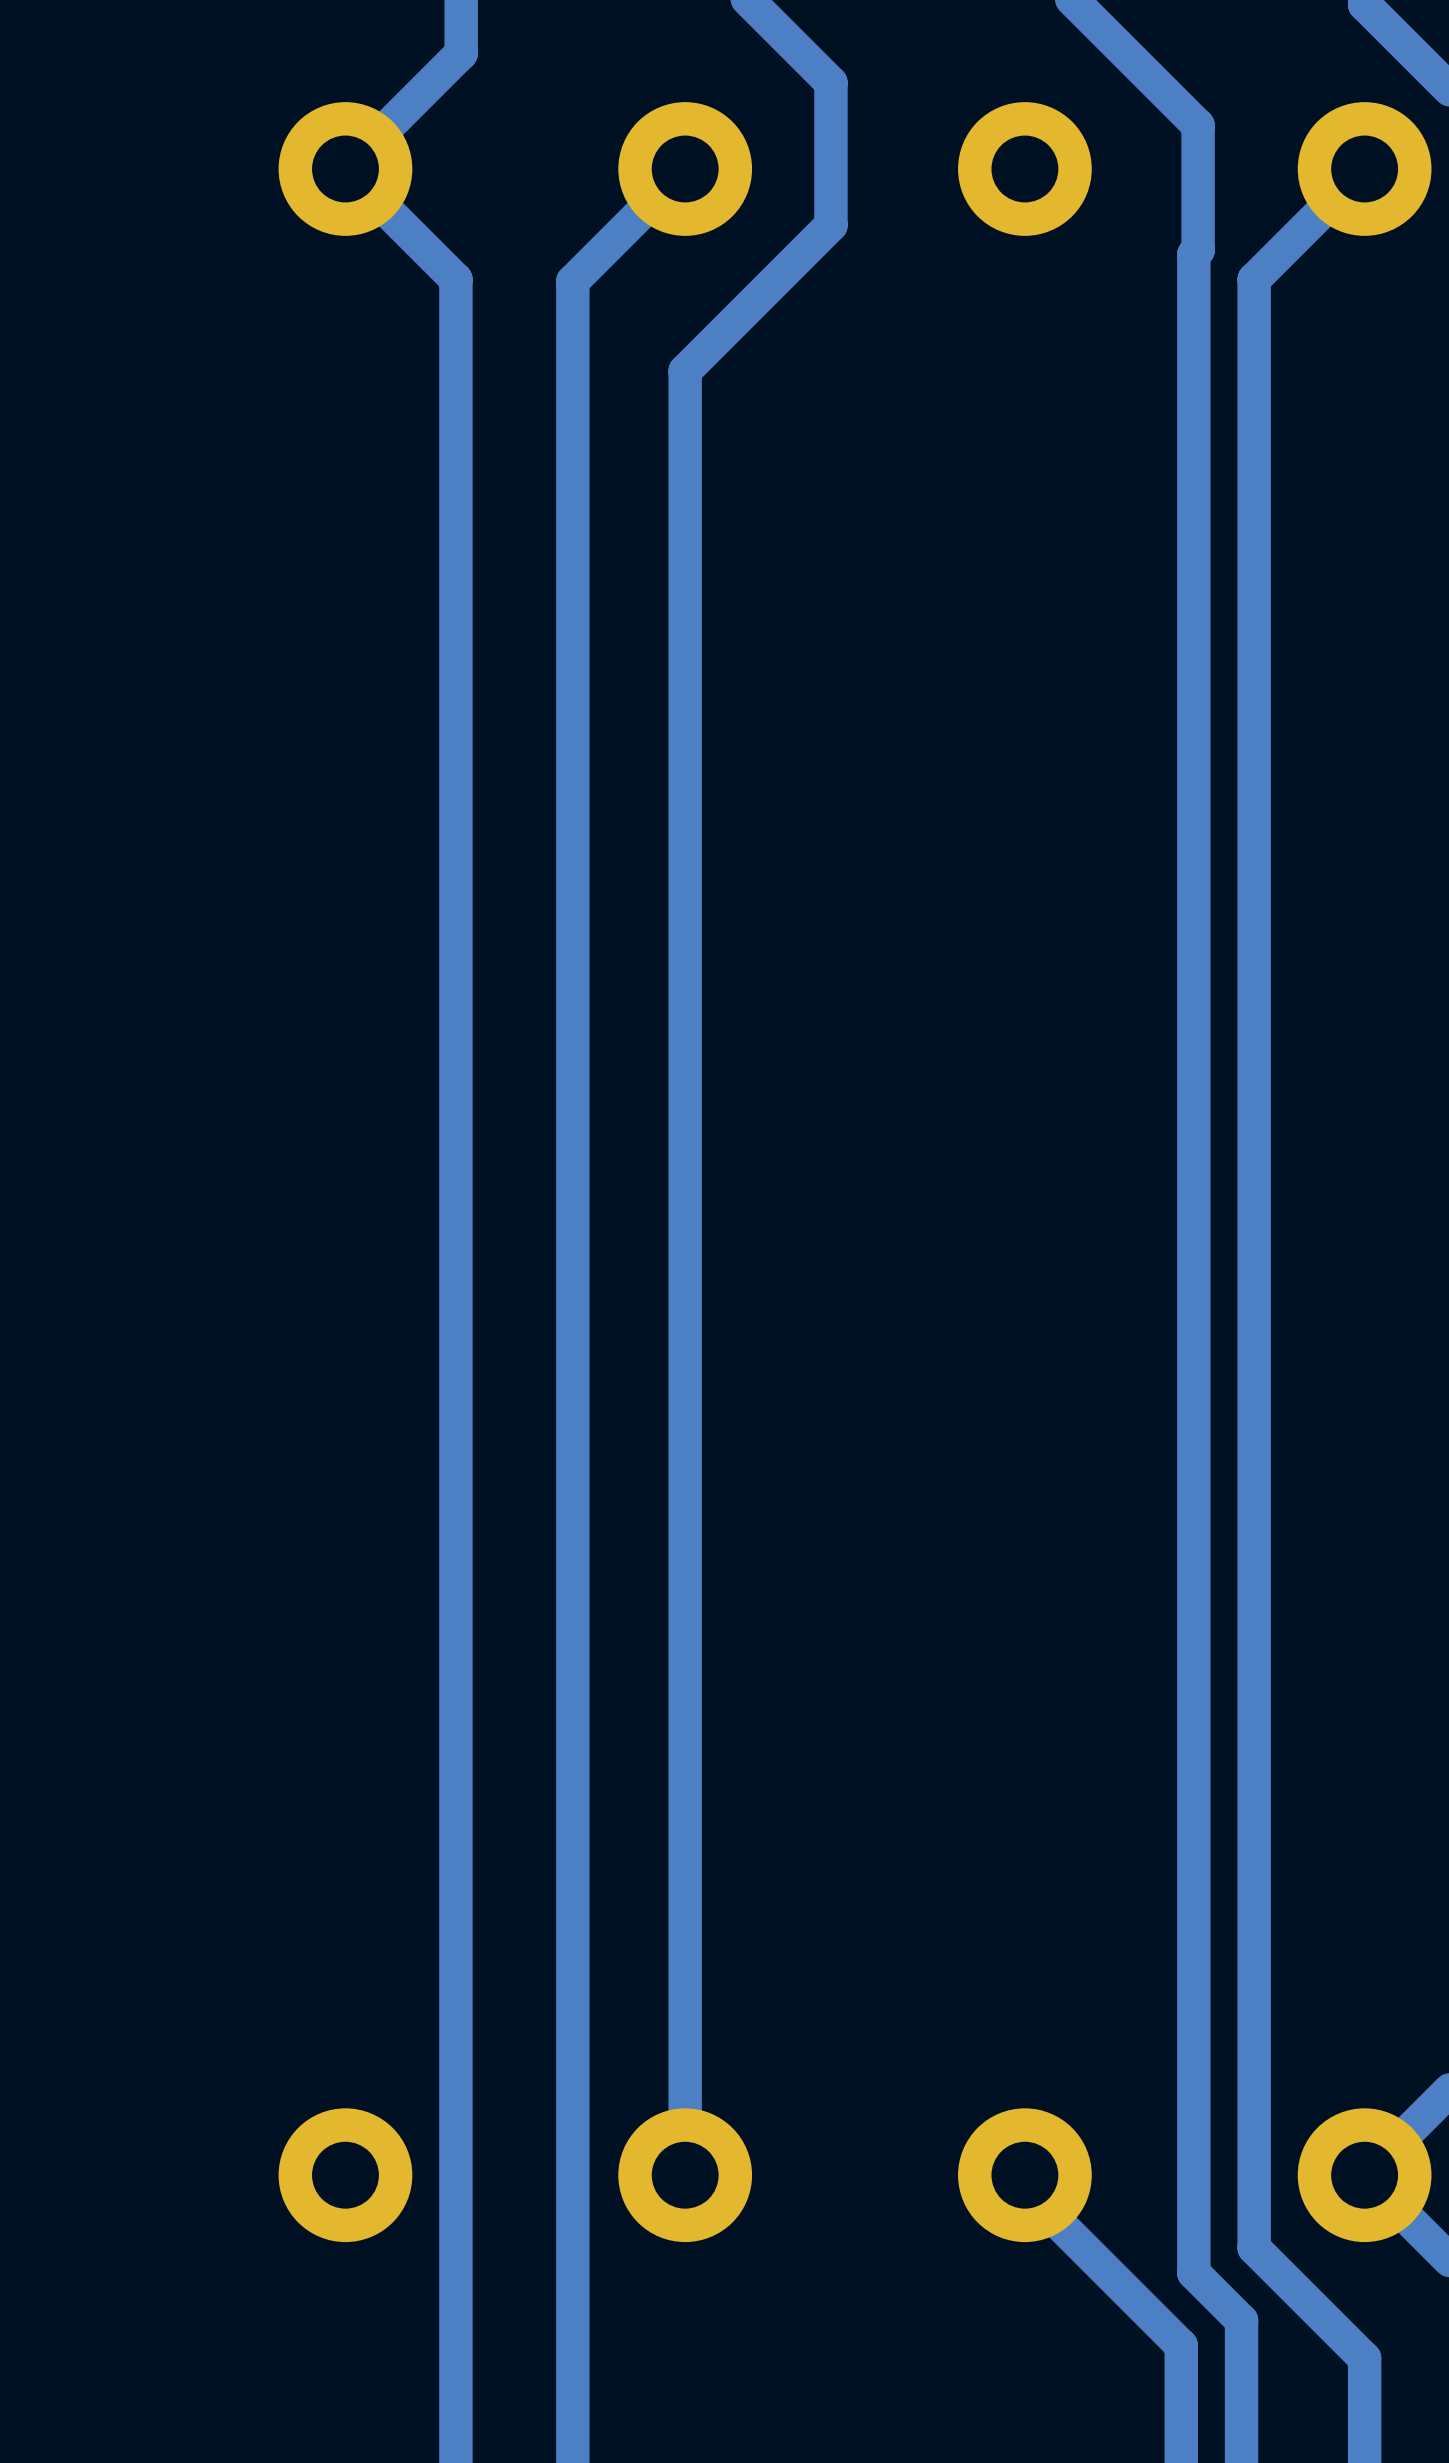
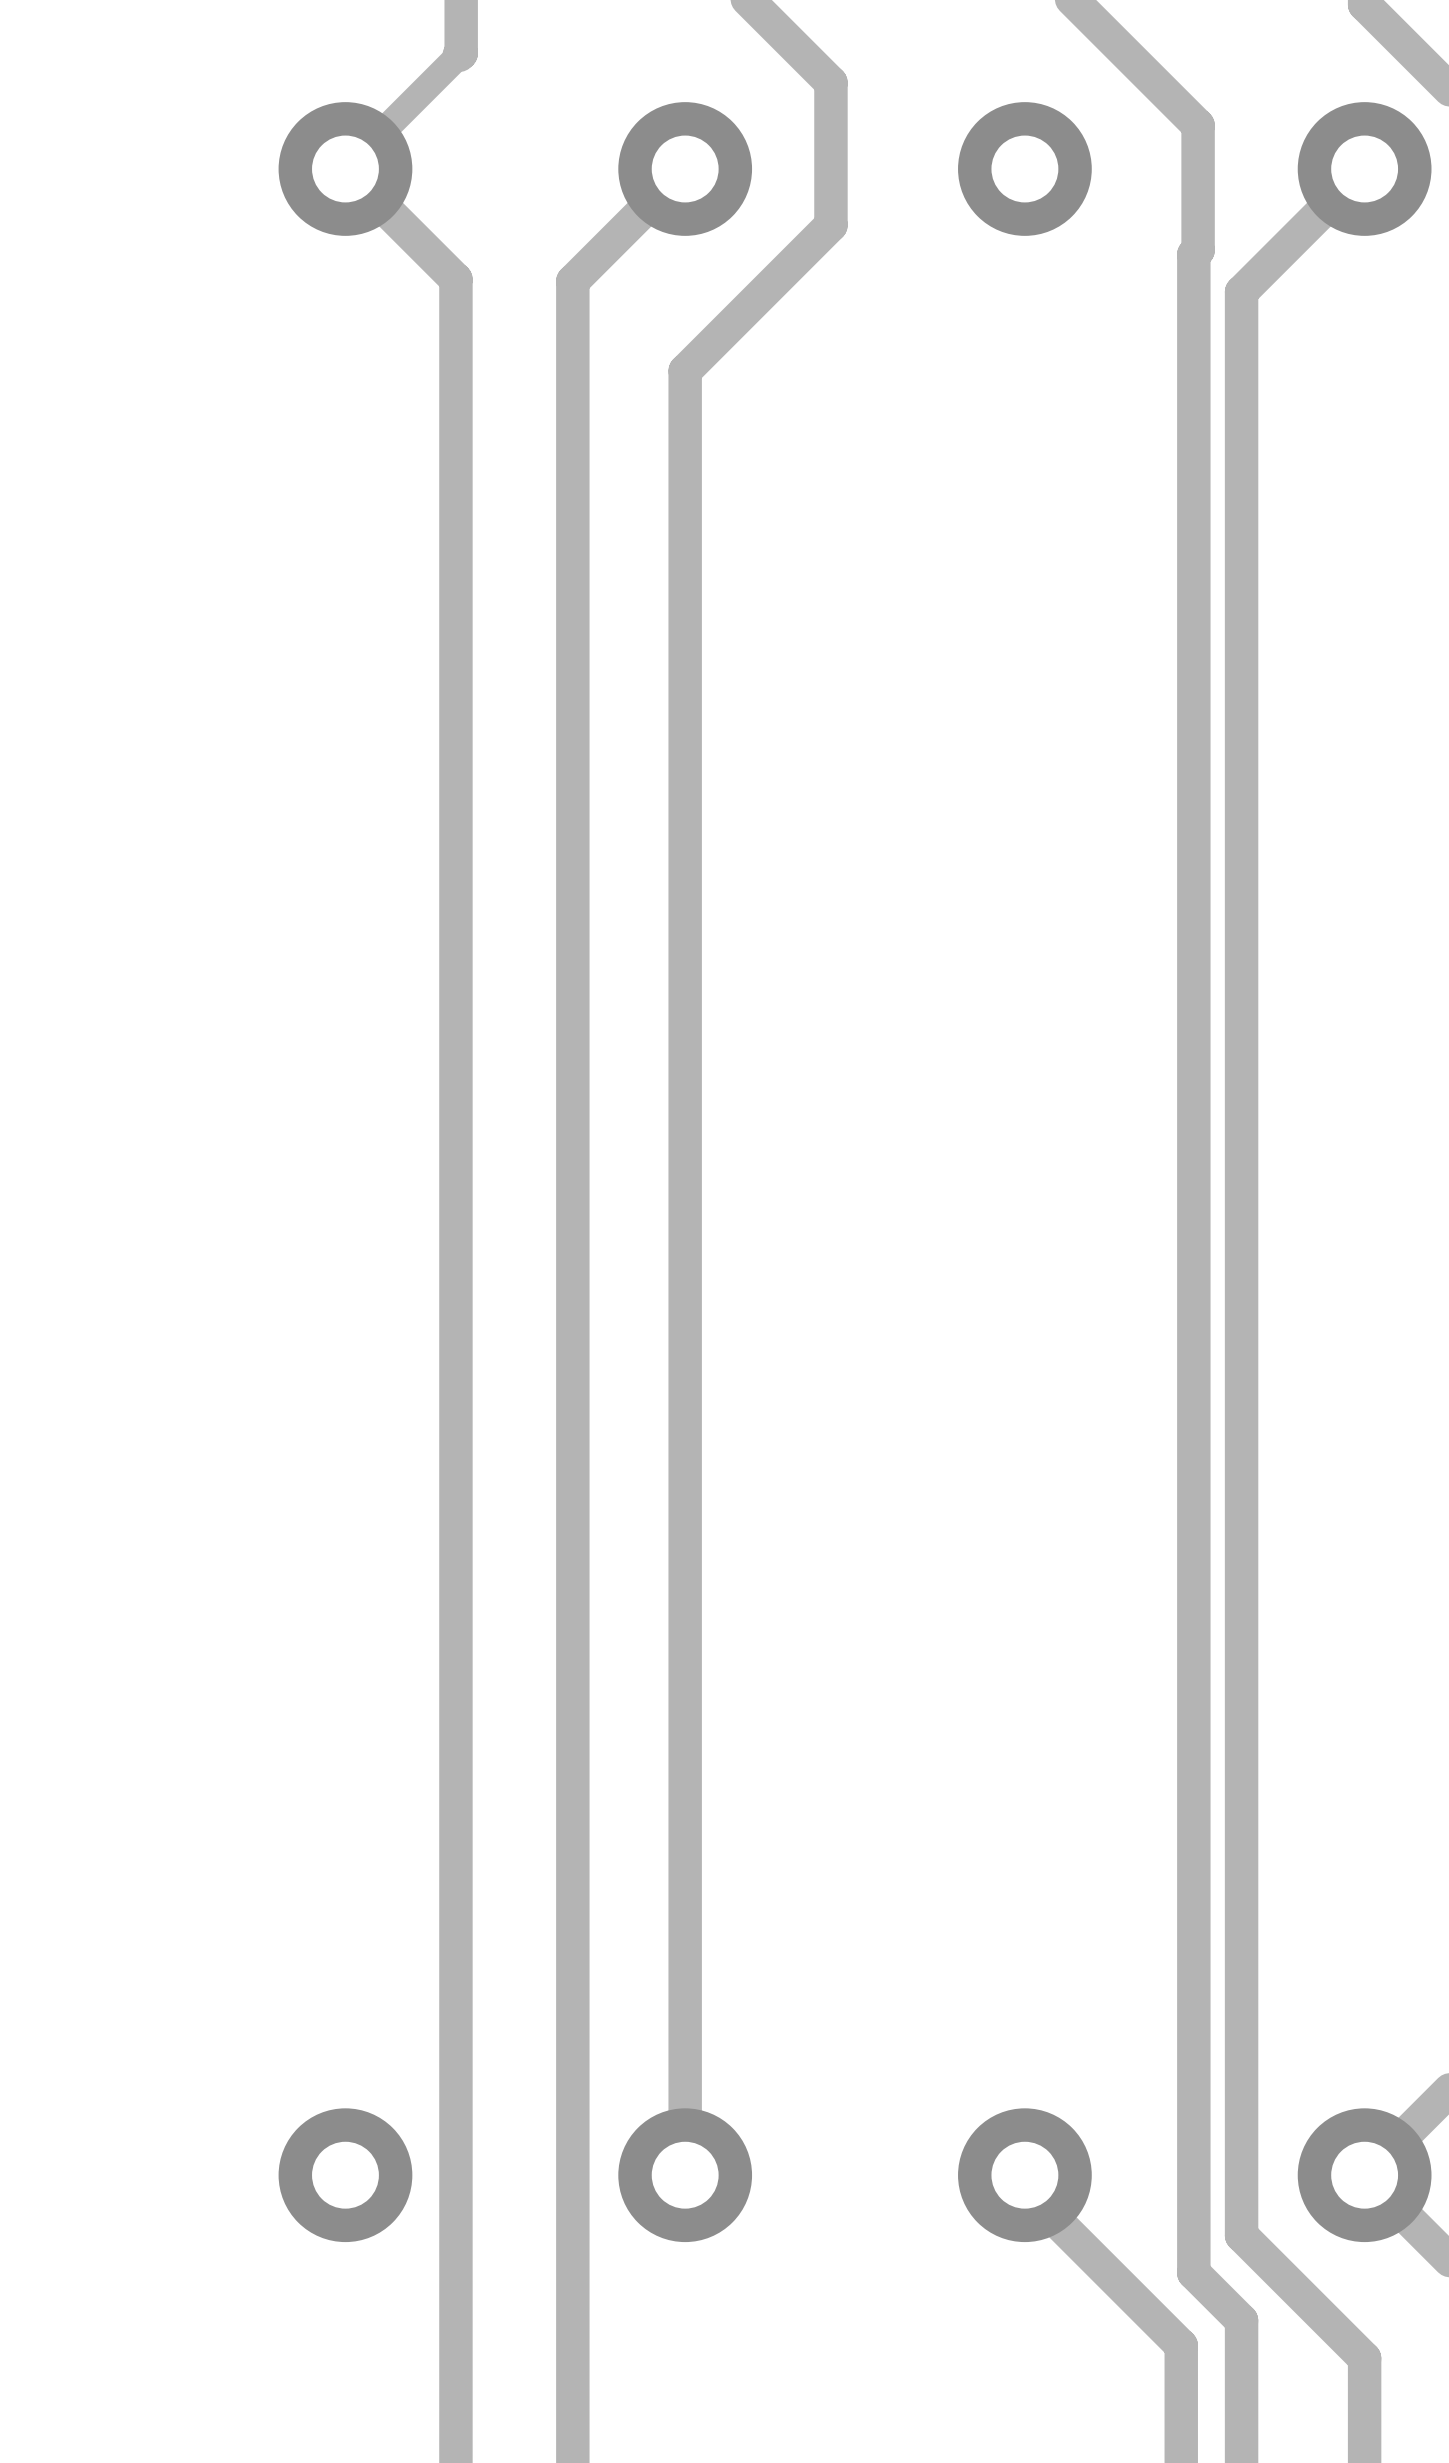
track width: thick (459, 55) (345, 168) -> thin (459, 55) (345, 168)
track: (1254, 279) (1254, 2247) -> (1254, 279) (1241, 292) (1241, 2235) (1254, 2247)

